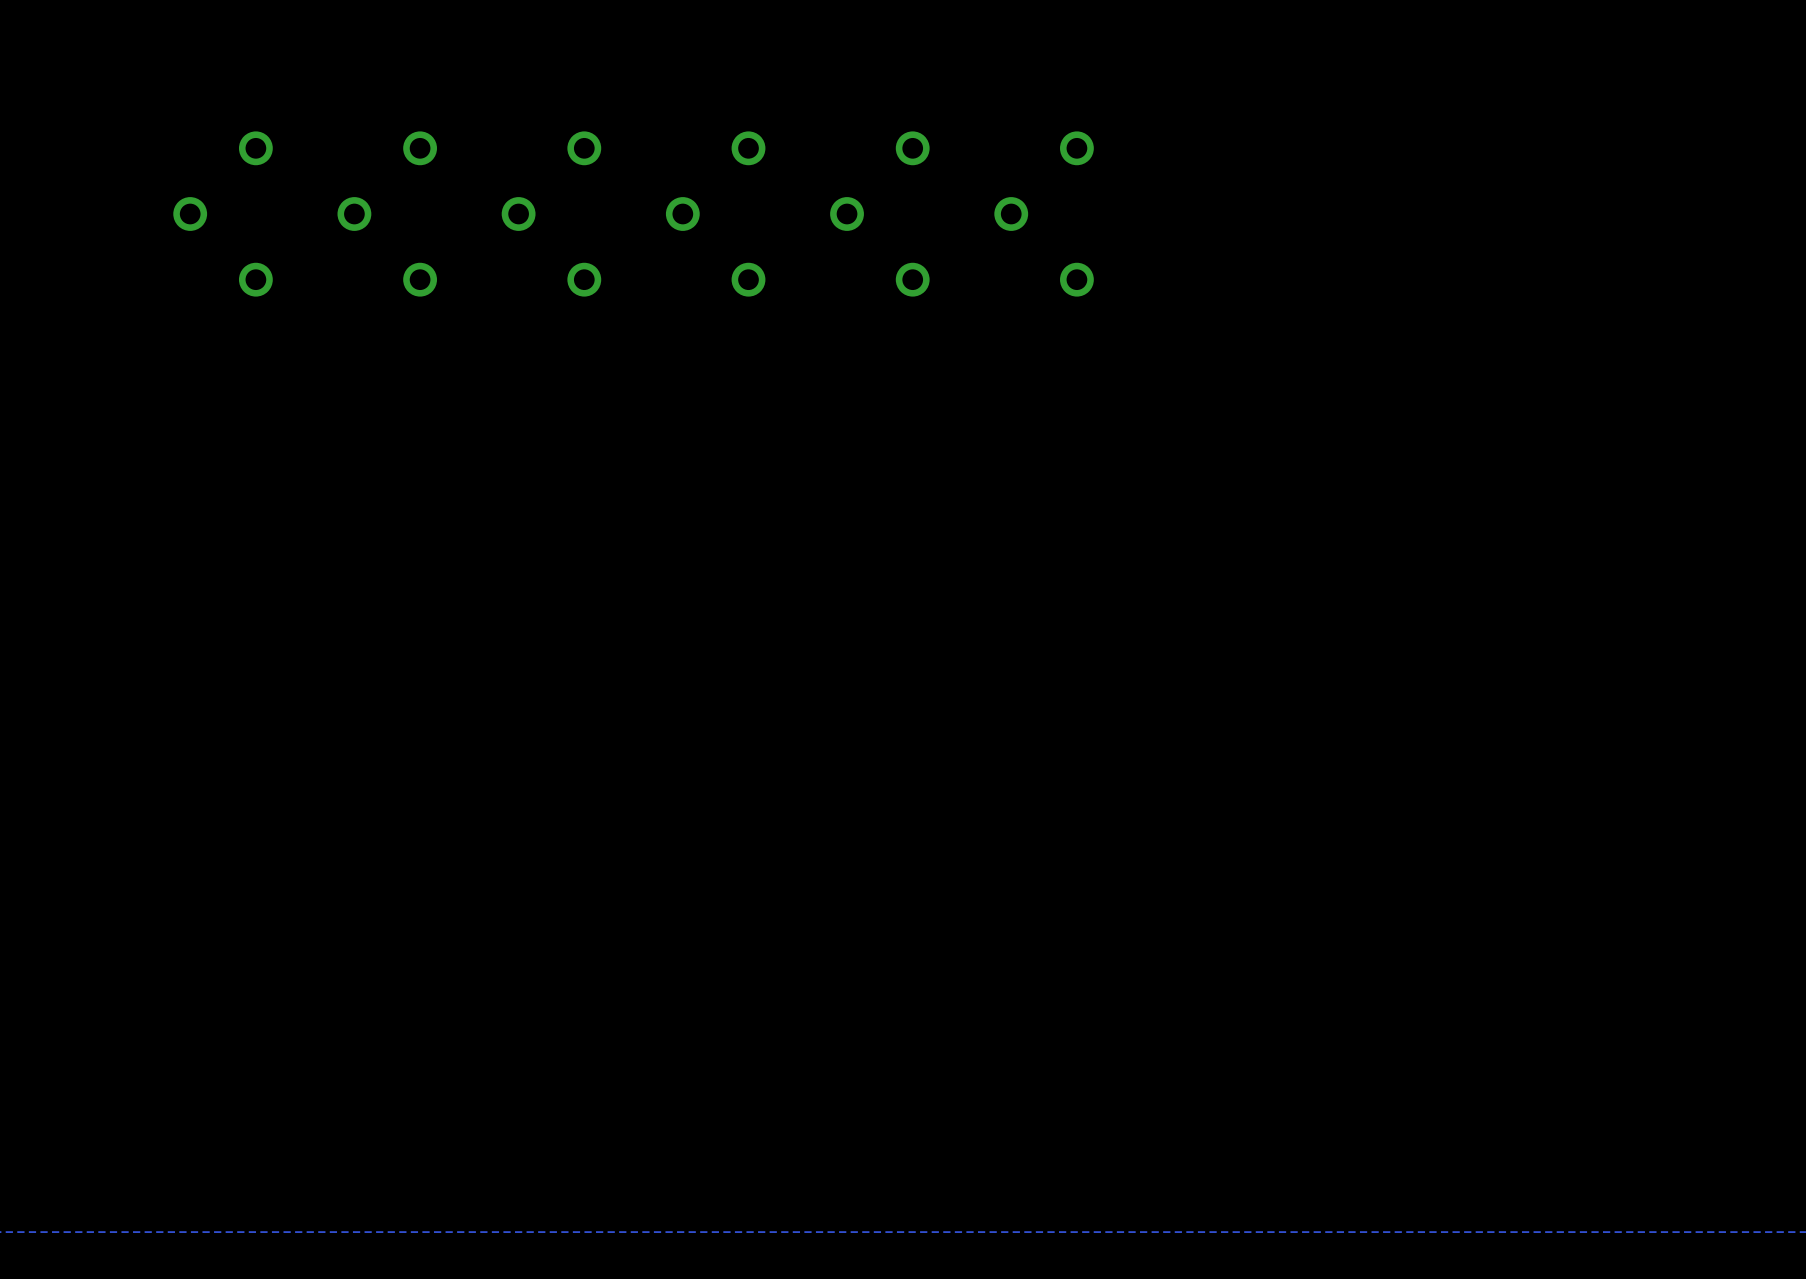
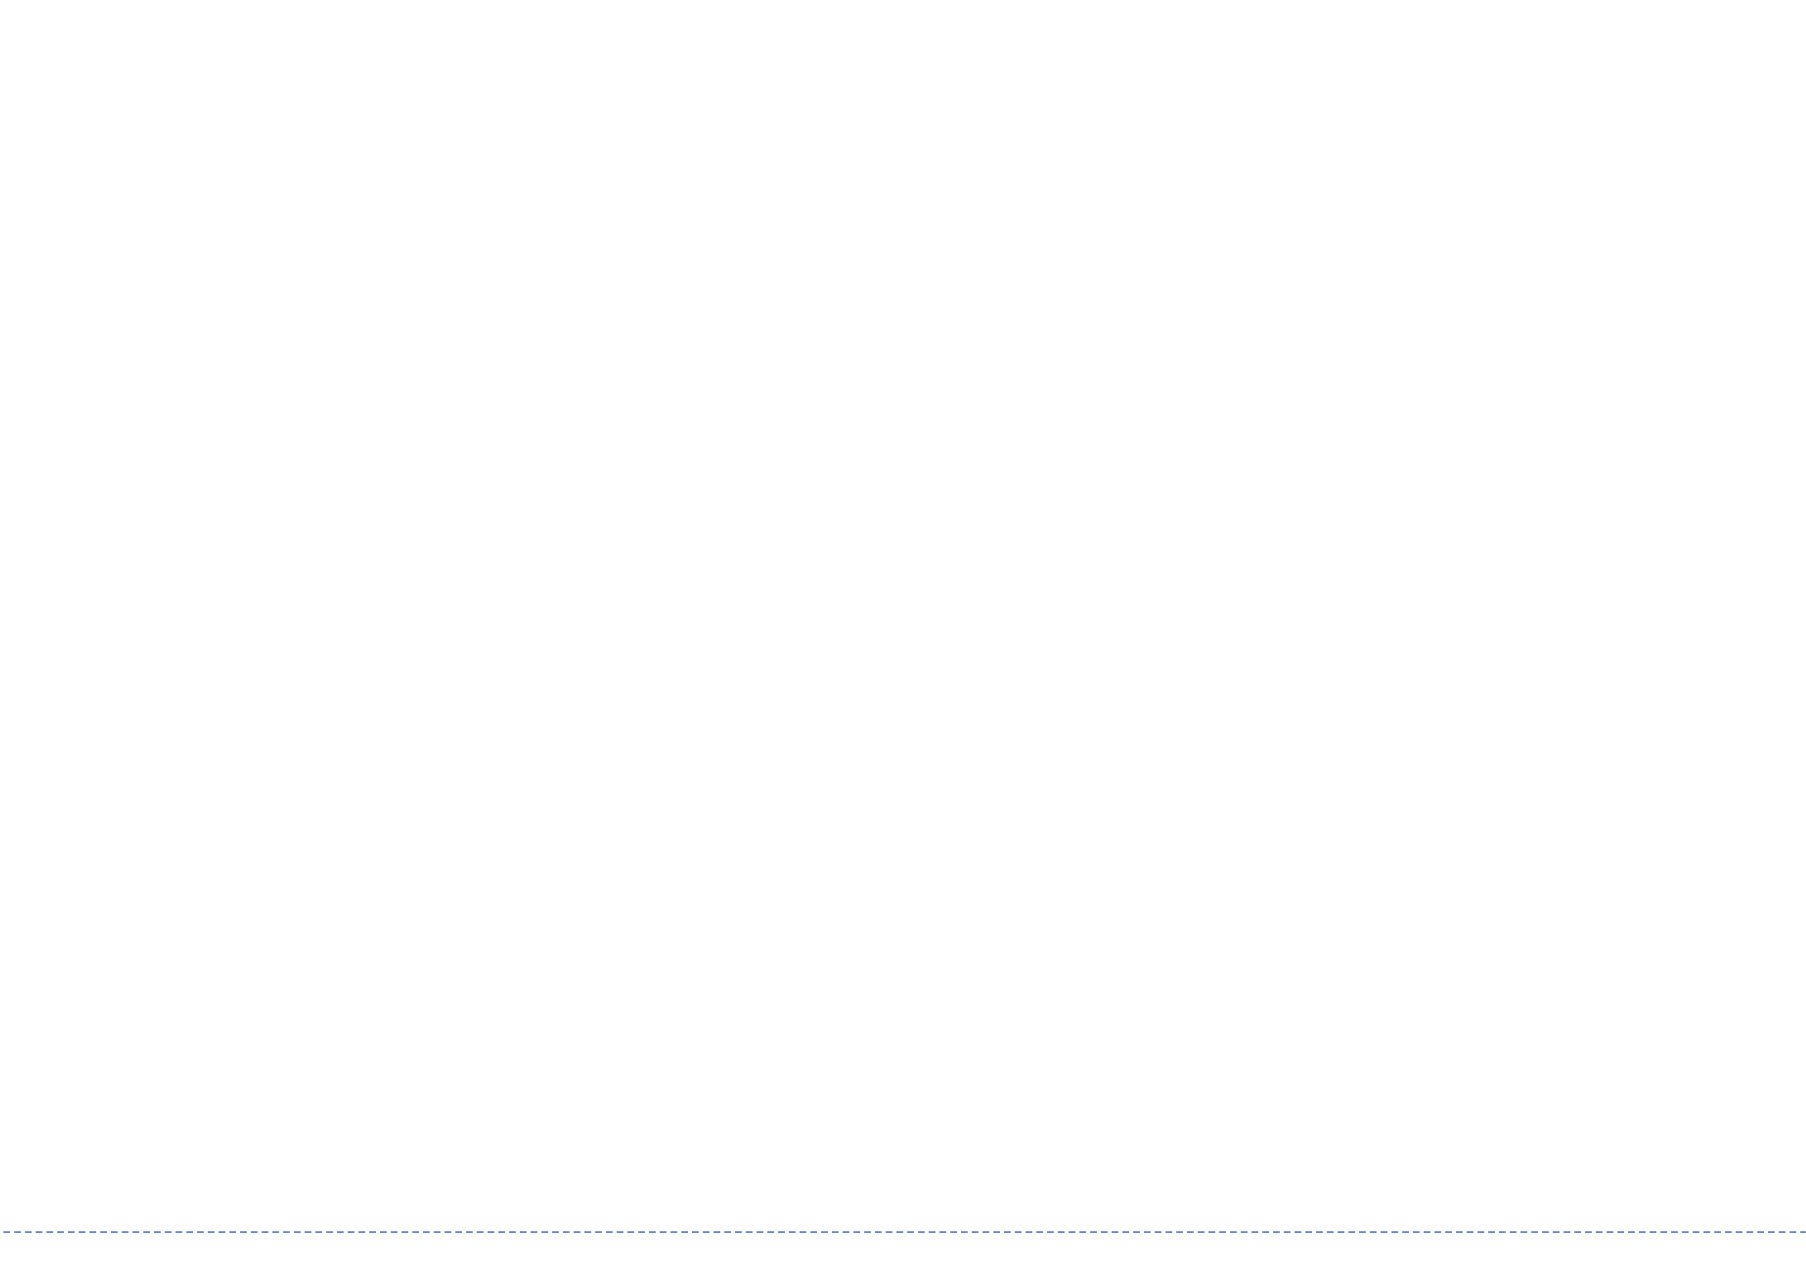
part: (223, 214) -> none
part: (387, 214) -> none
part: (551, 214) -> none
part: (715, 214) -> none
part: (879, 214) -> none
part: (1044, 214) -> none

